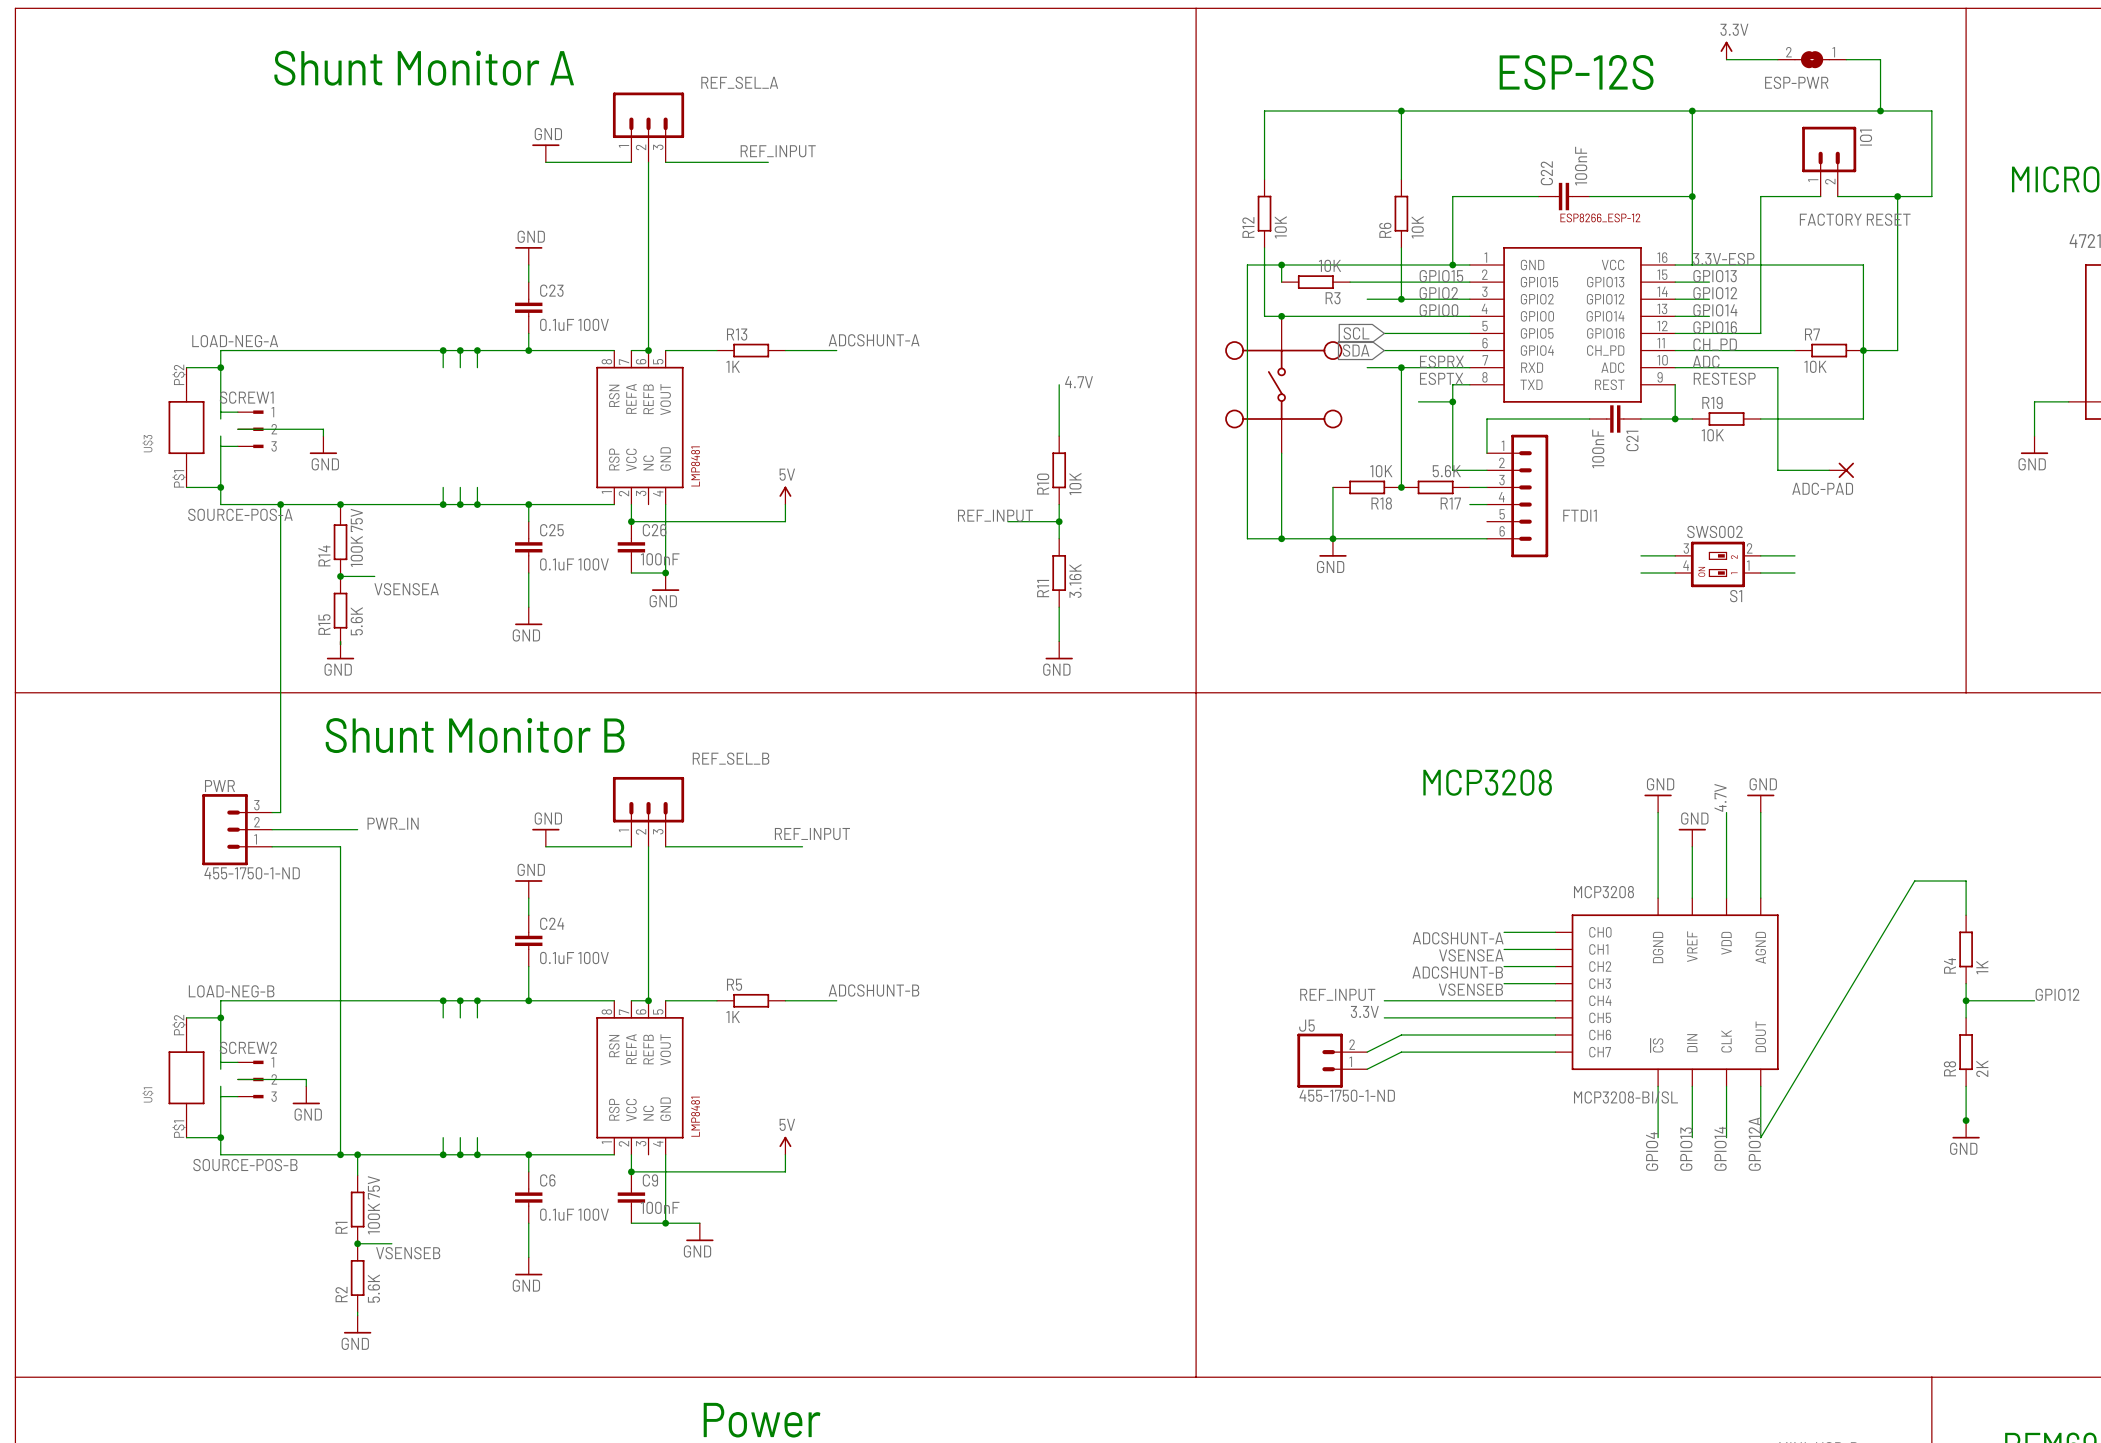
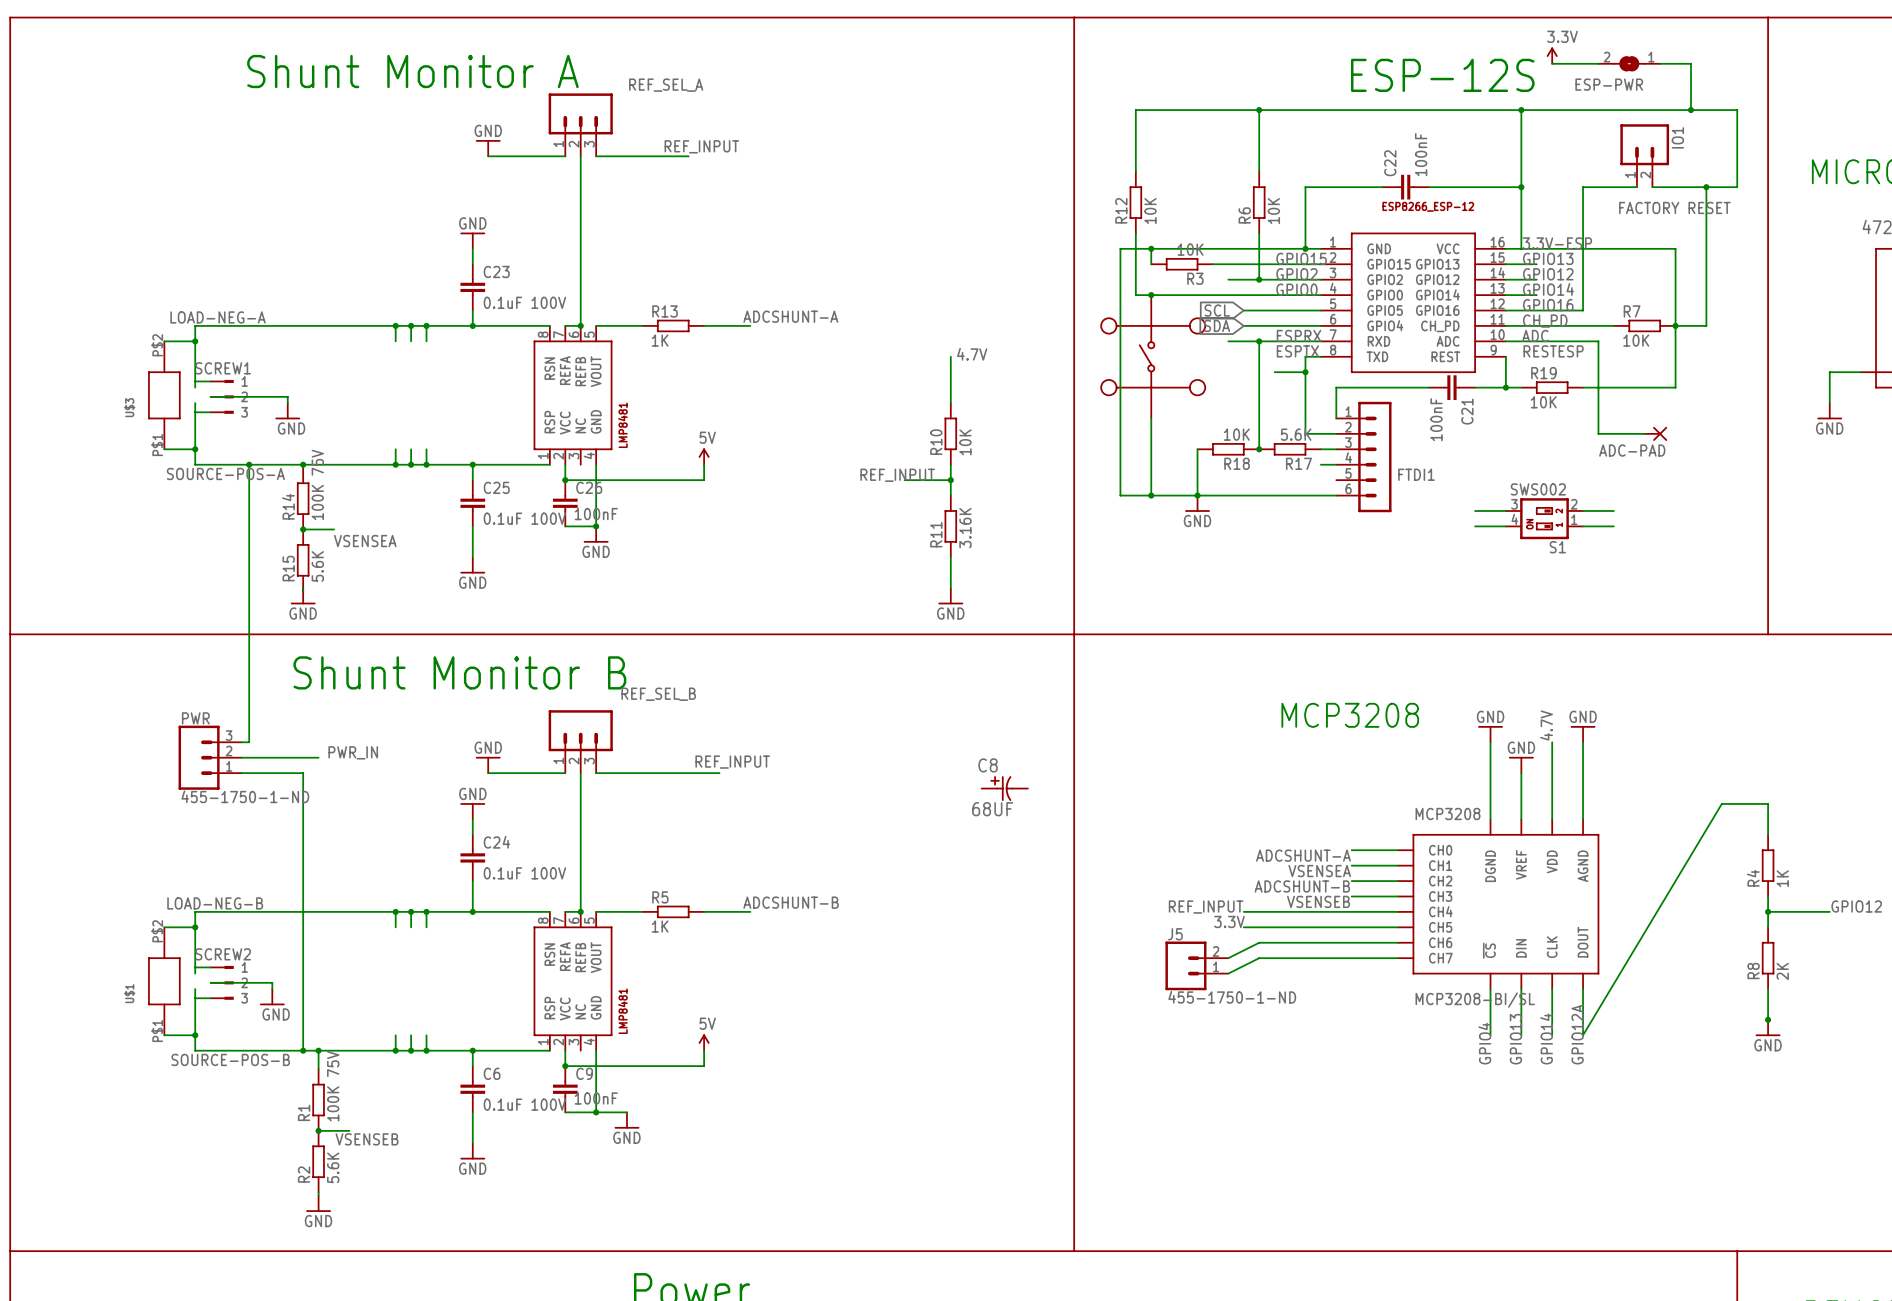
C8: none -> 68UF (1004, 788)

